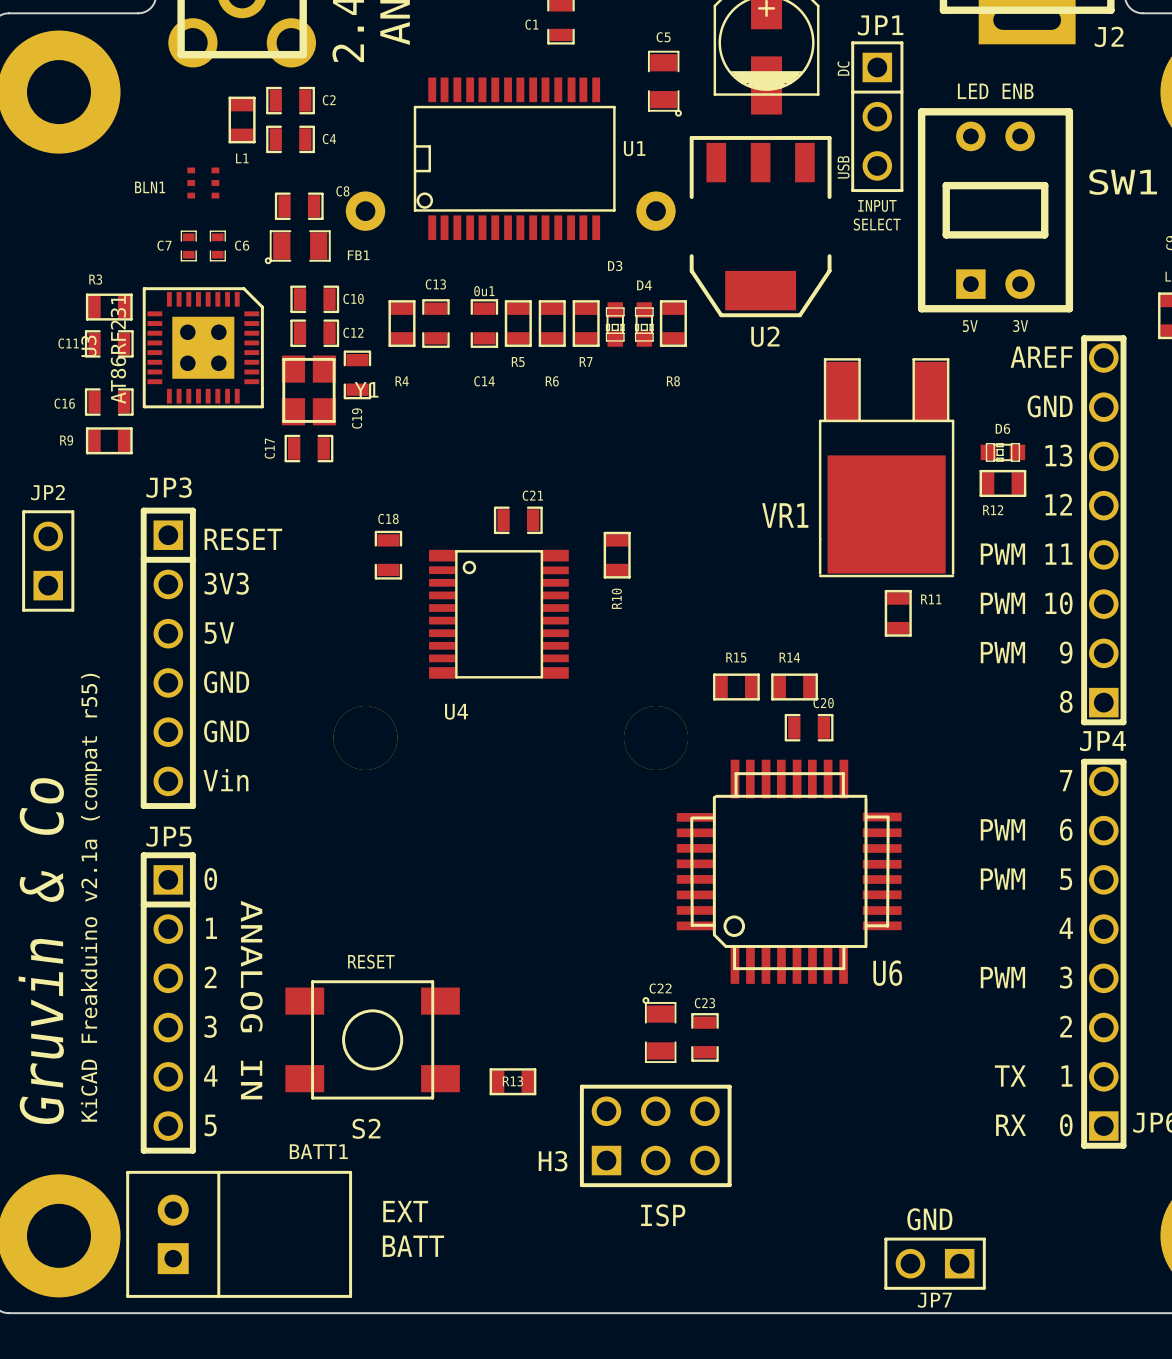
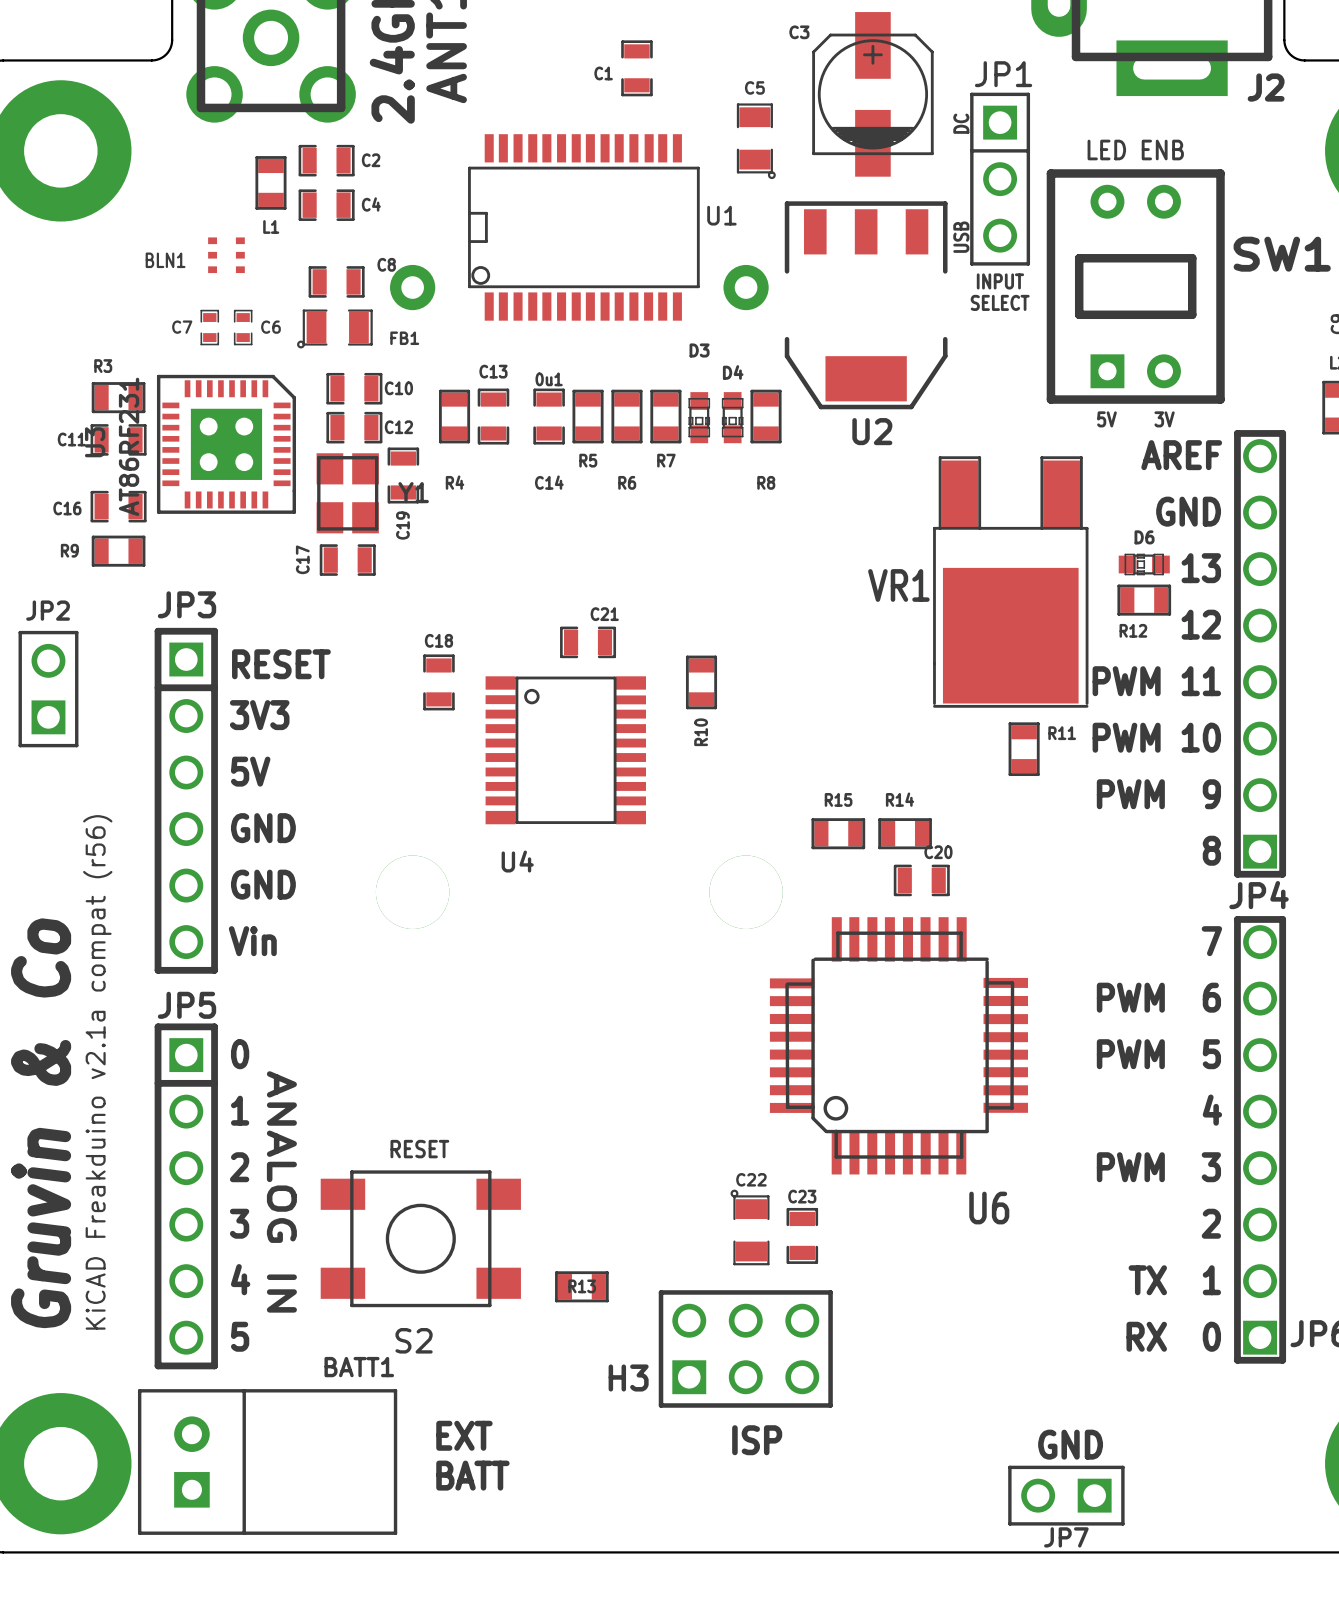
VR1 name position: VR1 (785, 515) -> VR1 (898, 585)
text: KiCAD Freakduino v2.1a (compat r55) (91, 897) -> KiCAD Freakduino v2.1a compat (r56) (97, 1072)
U6 name position: U6 (887, 973) -> U6 (989, 1208)

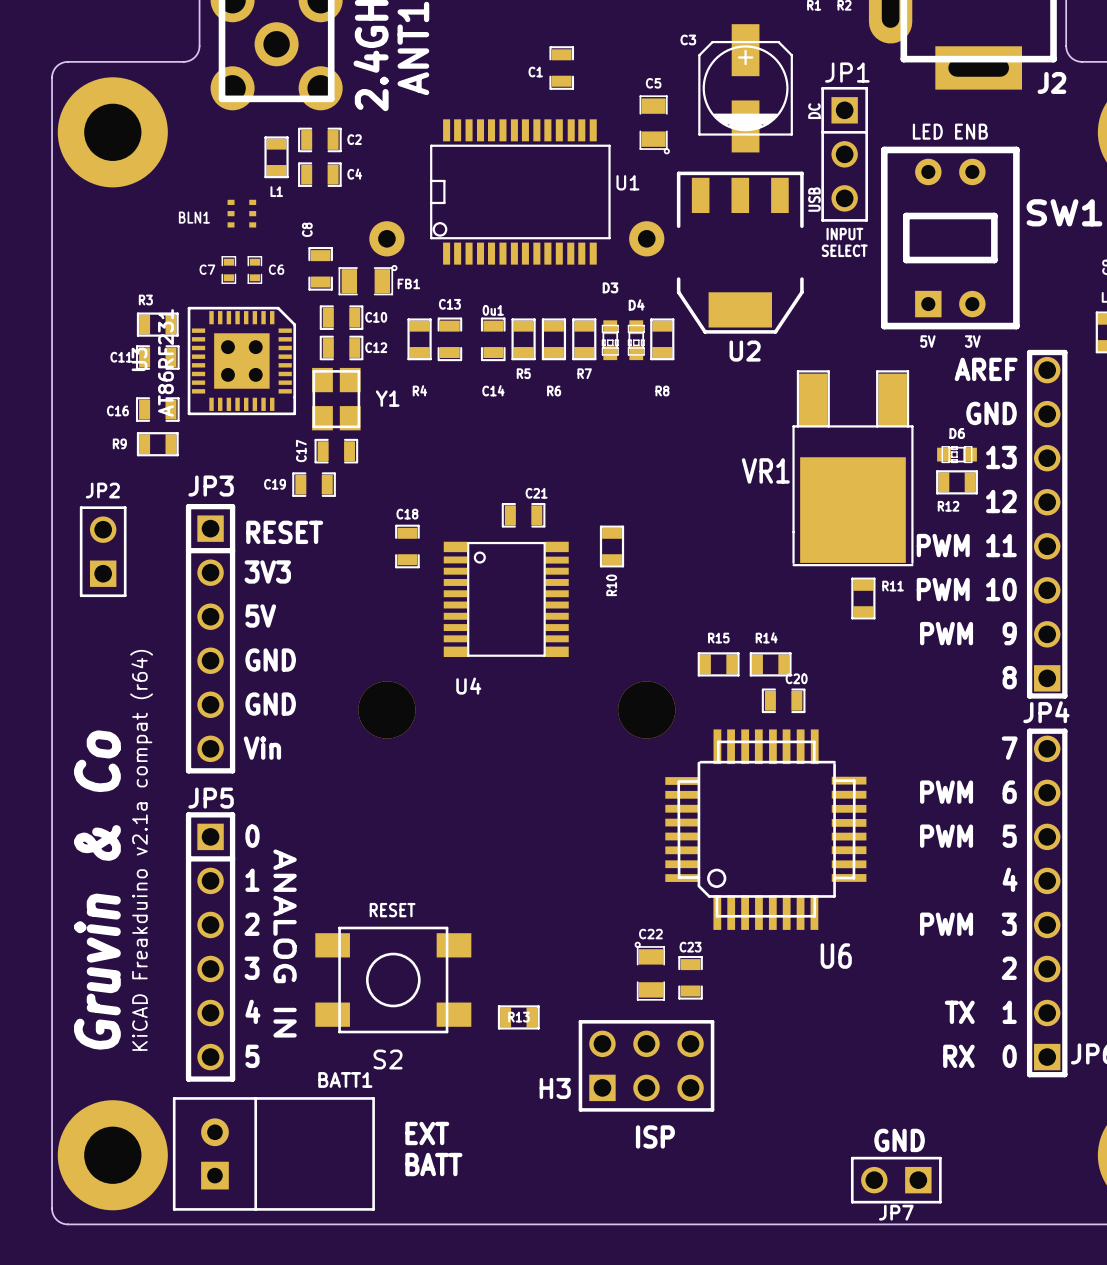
C8 name position: C8 (386, 264) -> C8 (307, 229)
C8 rotation: 0° (336, 281) -> 90° clockwise (320, 268)
C8 position: (336, 281) -> (320, 268)
FB1 rotation: 0° (334, 328) -> 180° (368, 280)
FB1 position: (334, 328) -> (368, 280)
C19 rotation: 0° (403, 475) -> 90° clockwise (314, 484)
C19 position: (403, 475) -> (314, 484)
text: KiCAD Freakduino v2.1a compat (r56) (97, 1072) -> KiCAD Freakduino v2.1a compat (r64) (141, 850)

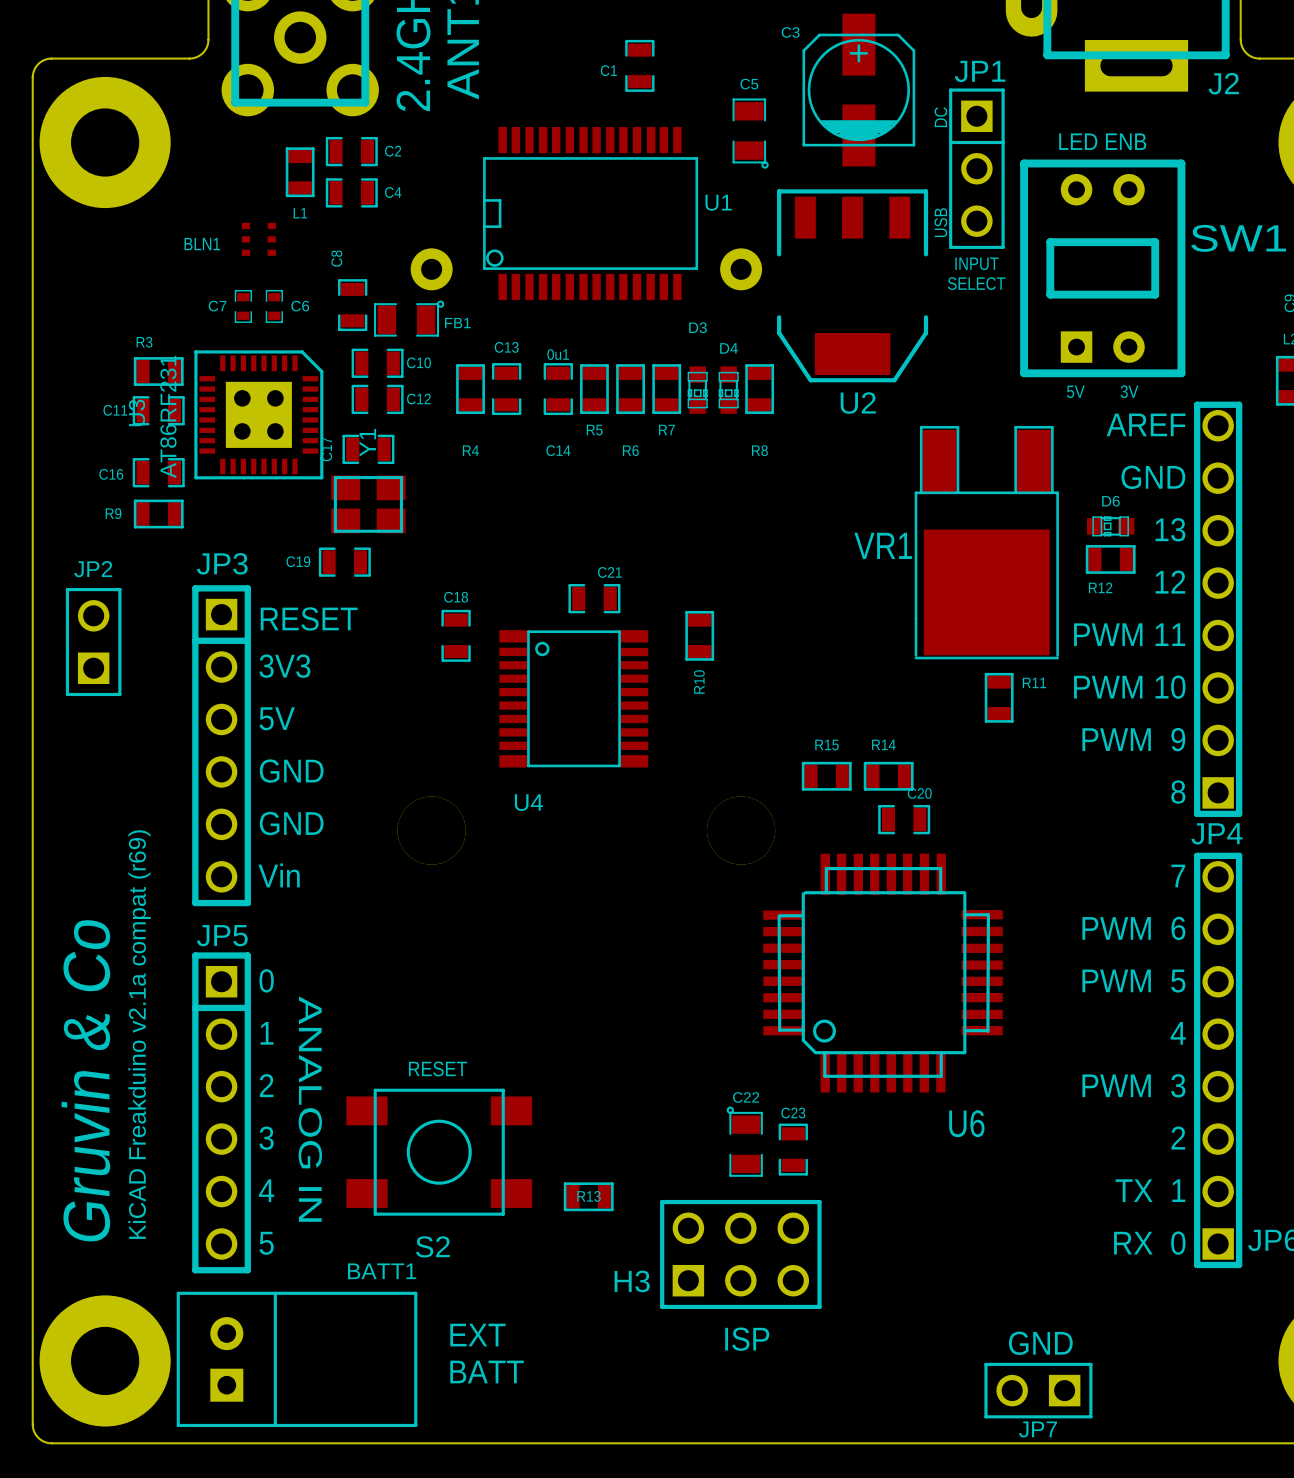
Y1 name position: Y1 (387, 398) -> Y1 (367, 442)
Y1 rotation: 0° (336, 399) -> 90° clockwise (368, 504)
C17 position: (336, 451) -> (368, 449)
text: KiCAD Freakduino v2.1a compat (r64) (141, 850) -> KiCAD Freakduino v2.1a compat (r69) (139, 1034)

